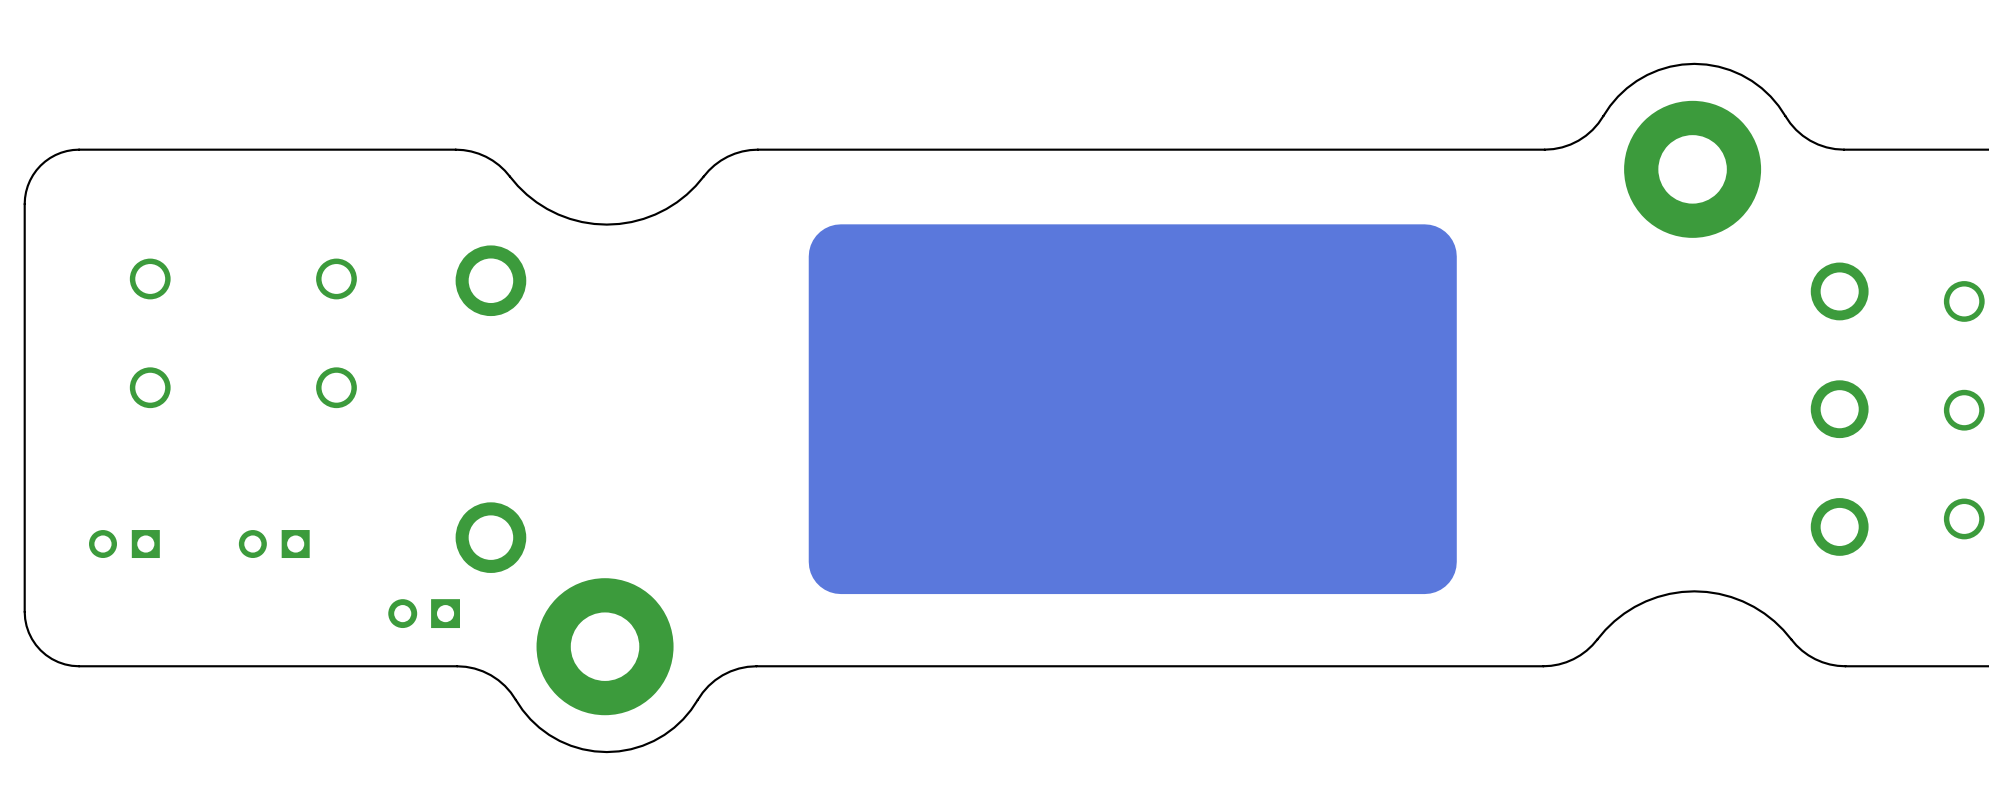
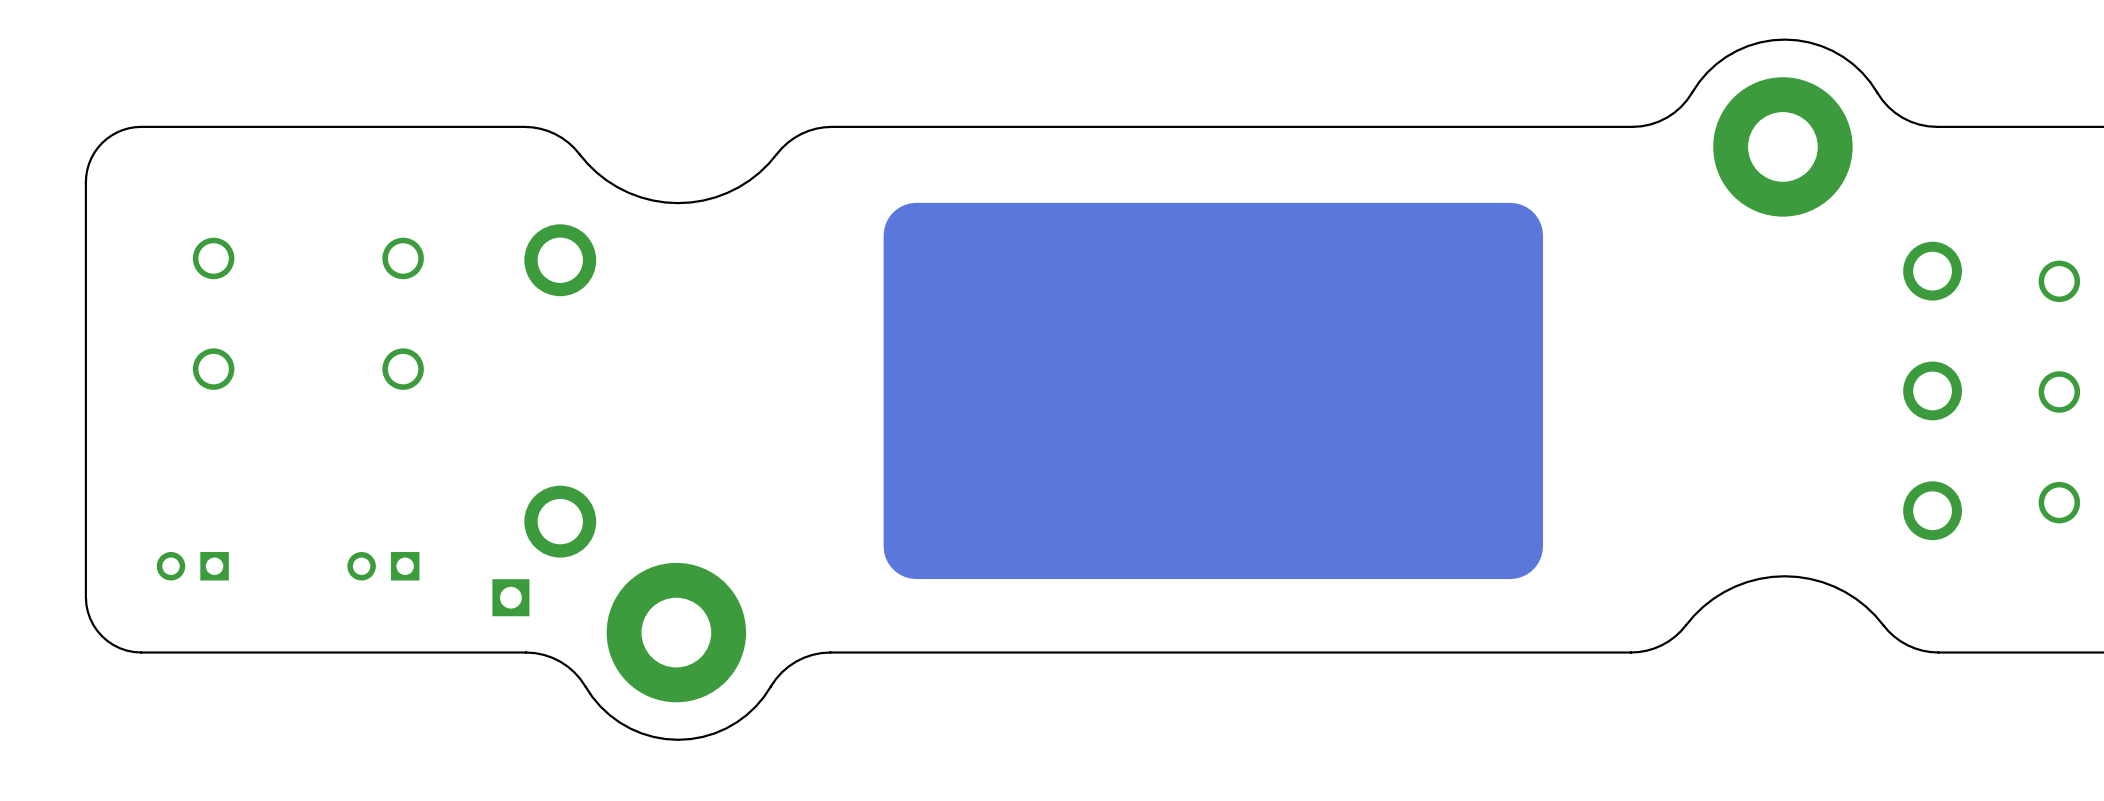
part position: (124, 544) -> (192, 566)
part position: (274, 544) -> (383, 566)
part footprint: [388, 599, 460, 629] -> [492, 579, 530, 617]

